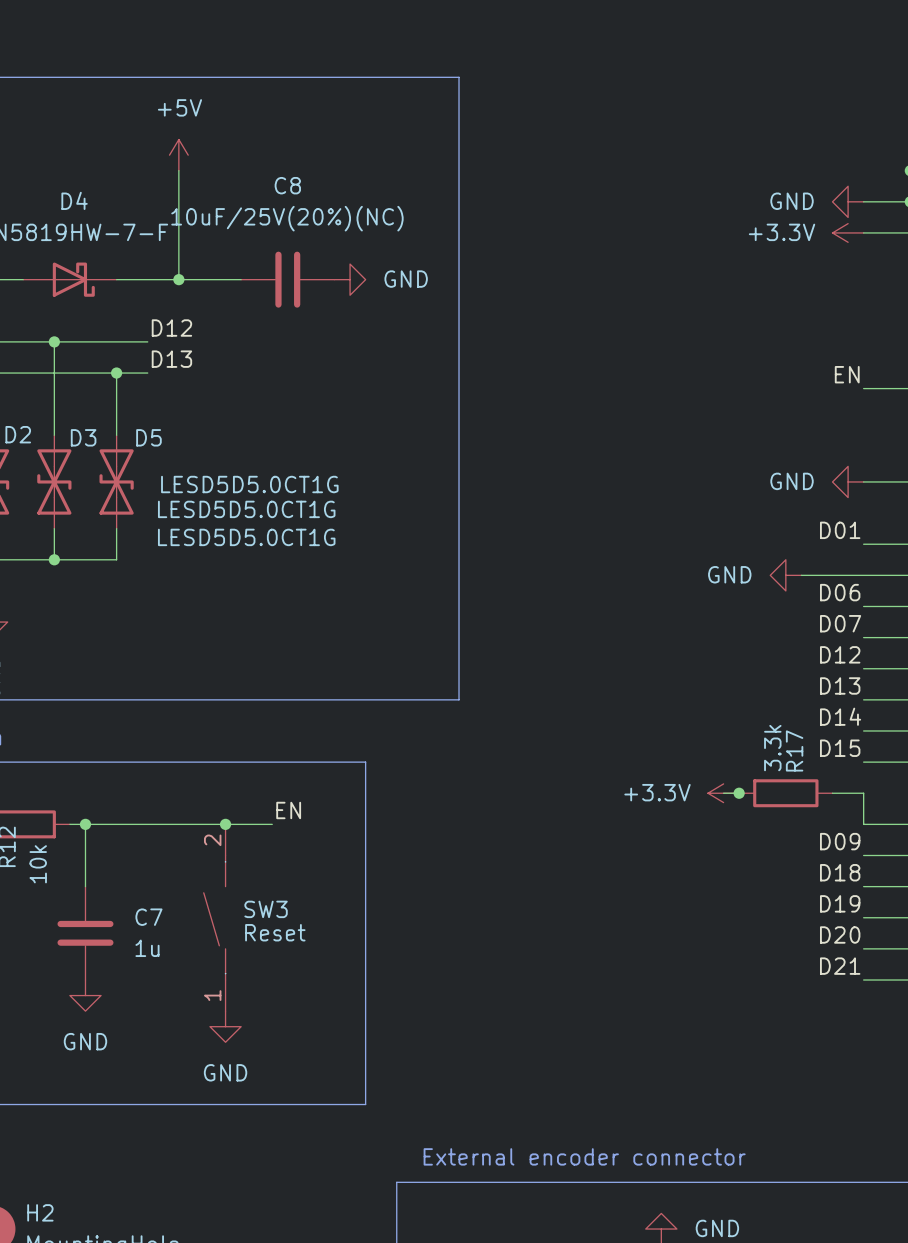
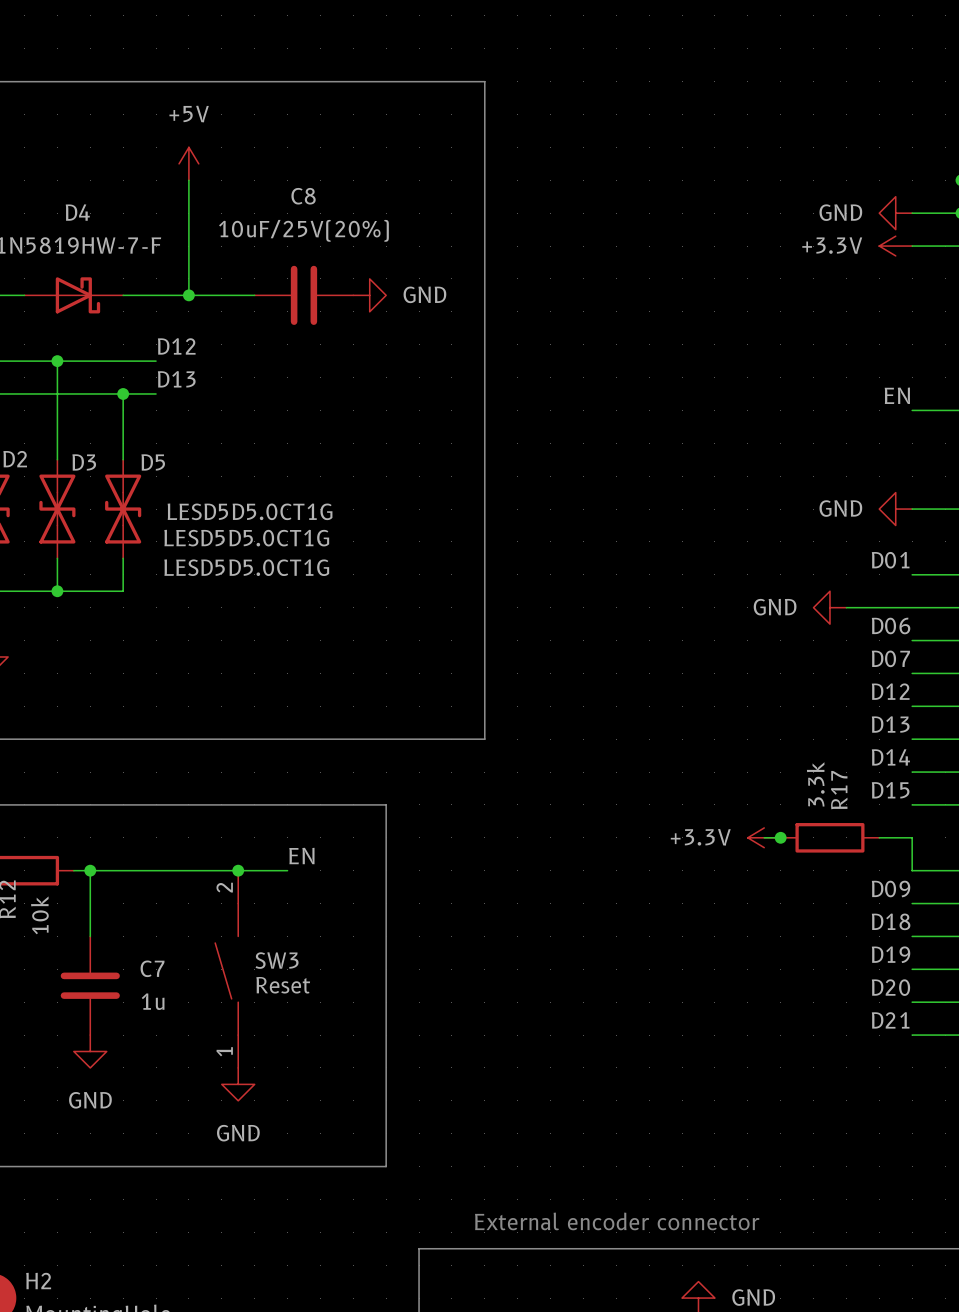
C8 value: 10uF/25V(20%)(NC) (287, 218) -> 10uF/25V(20%) (303, 230)

